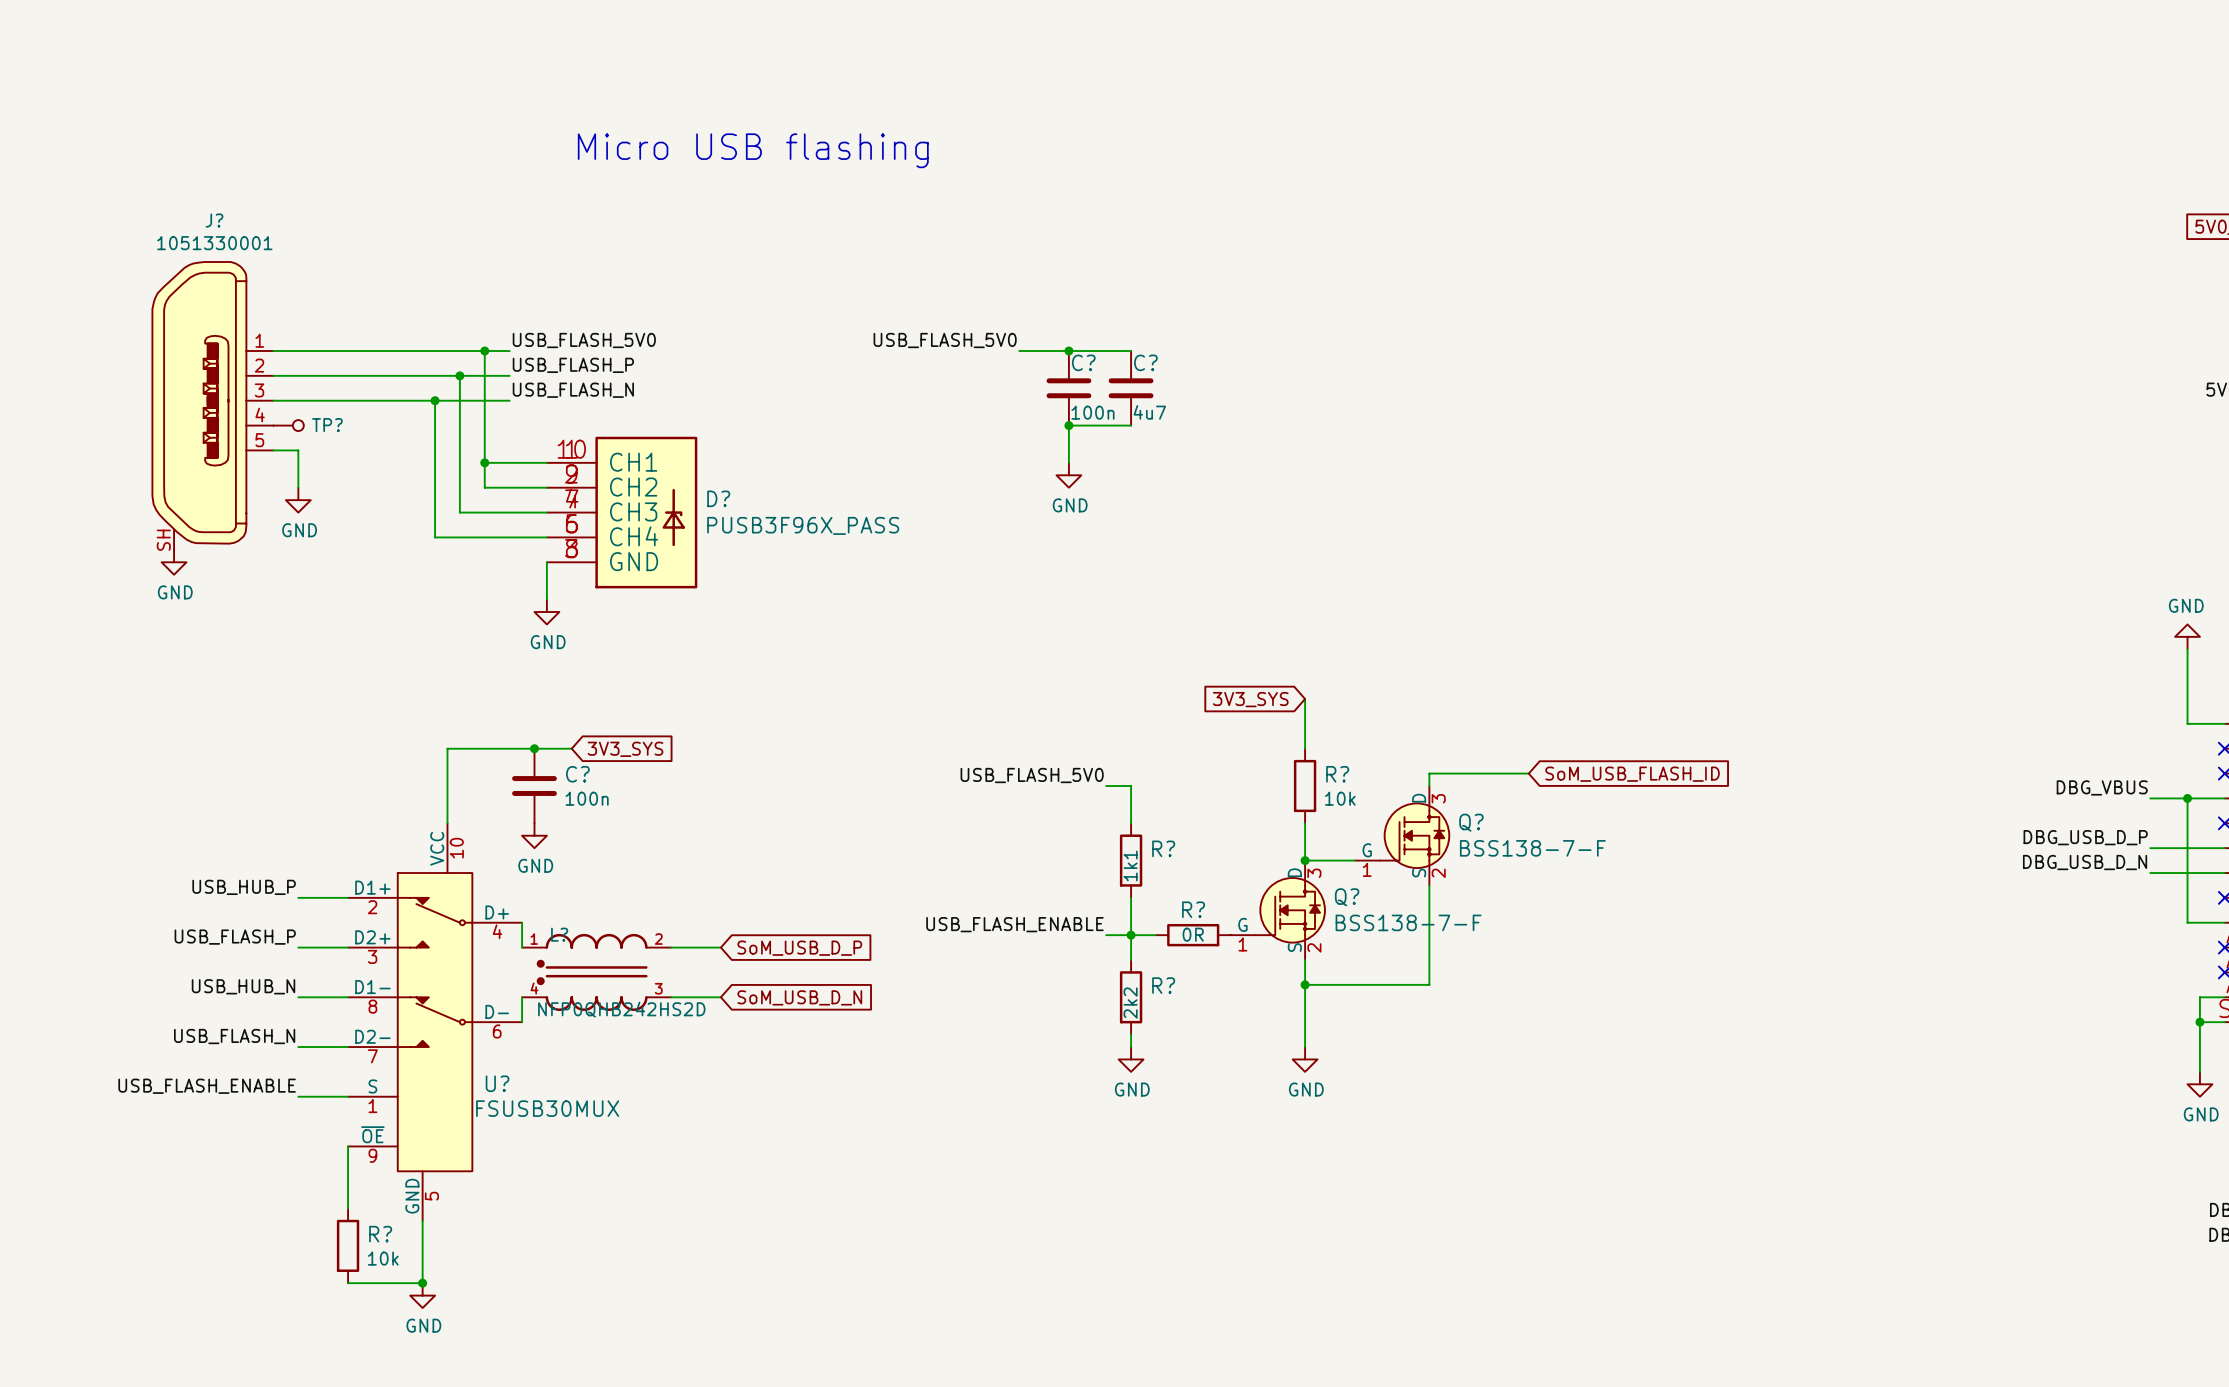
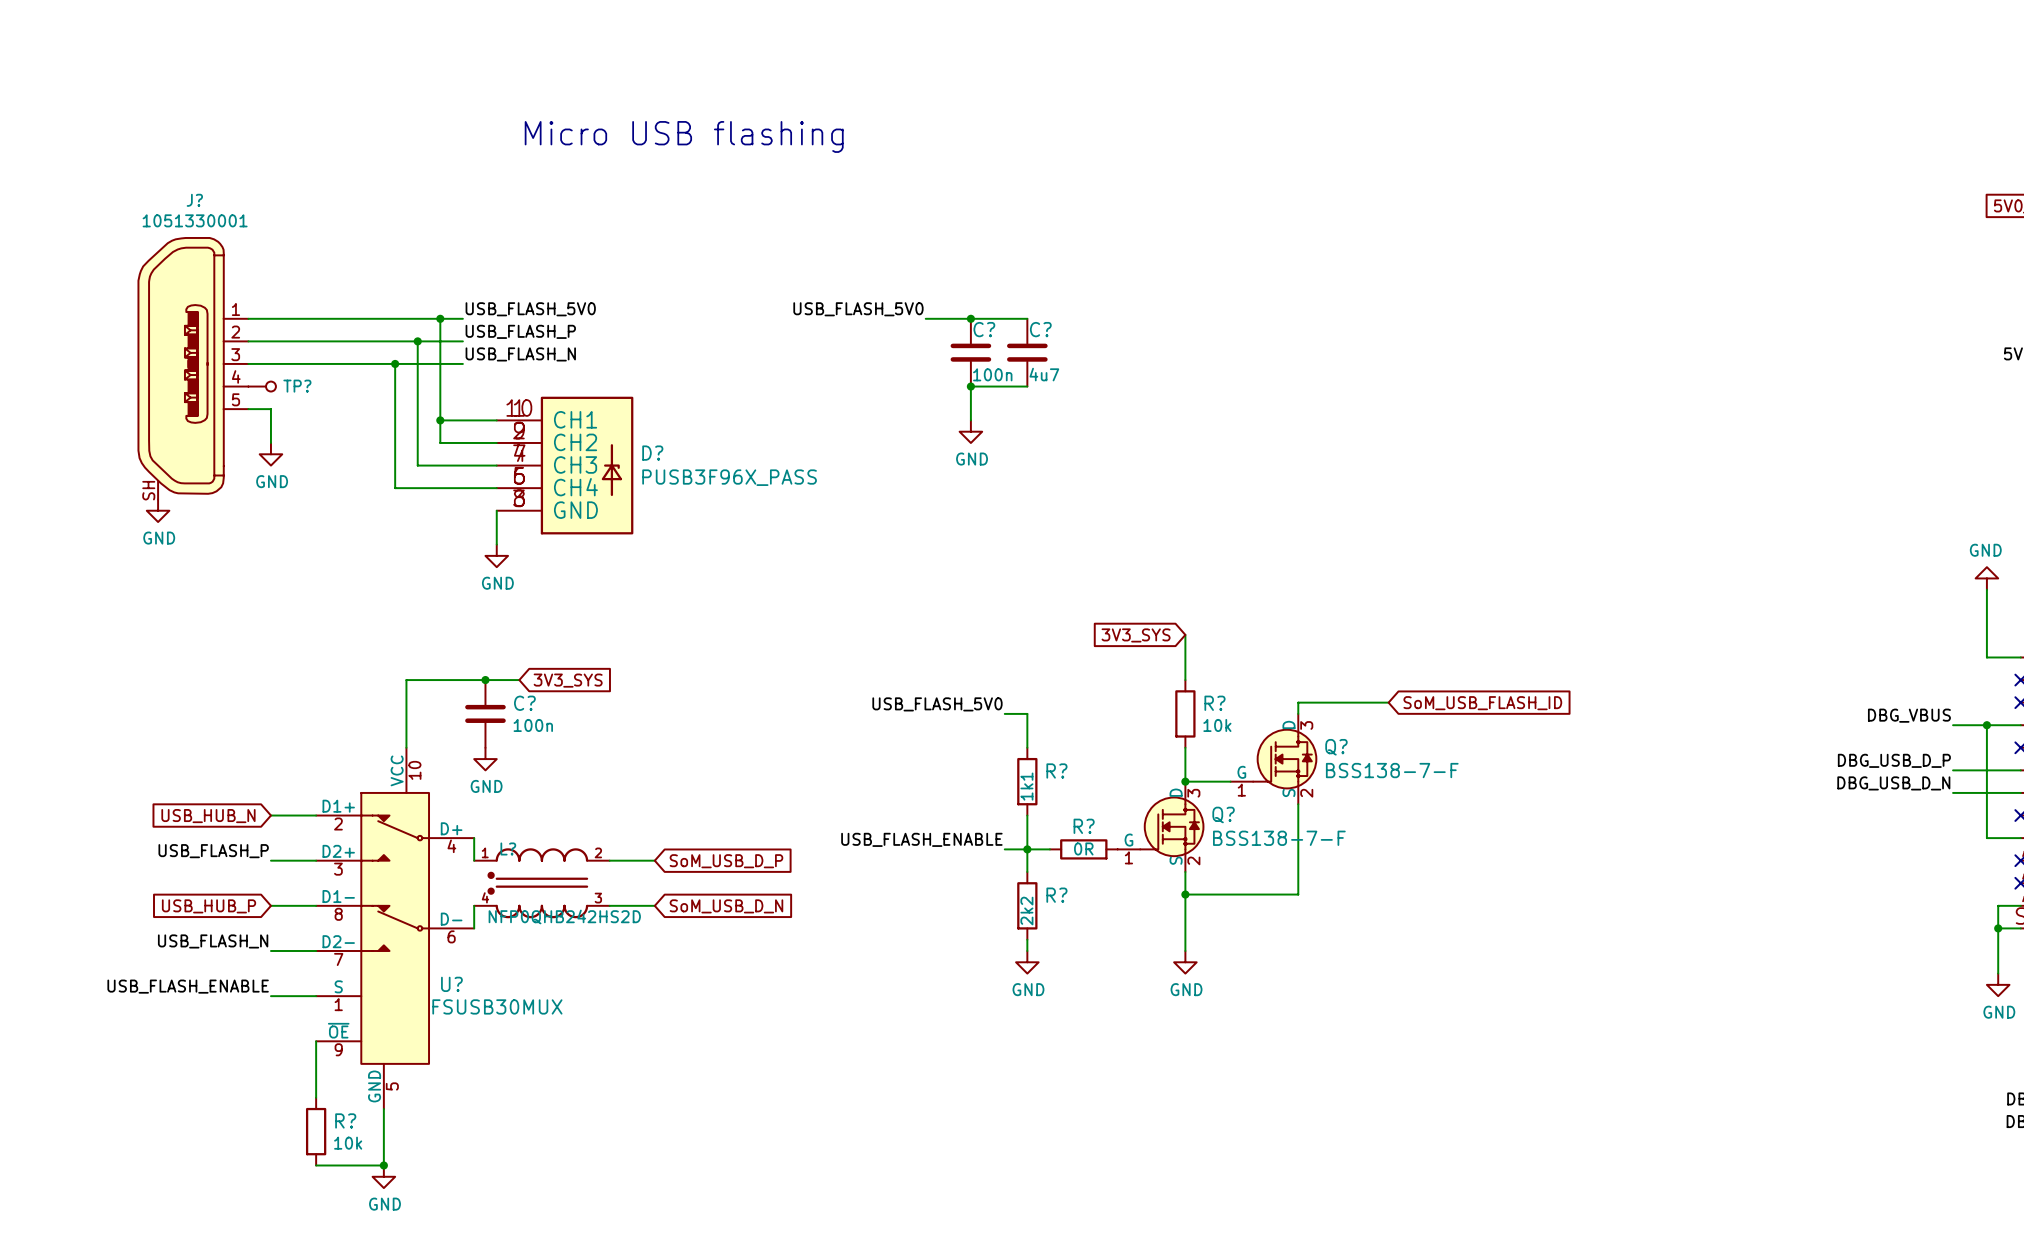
label: USB_HUB_P (244, 887) -> none
global label: none -> USB_HUB_N (208, 816)
label: USB_HUB_N (243, 986) -> none
global label: none -> USB_HUB_P (209, 906)

